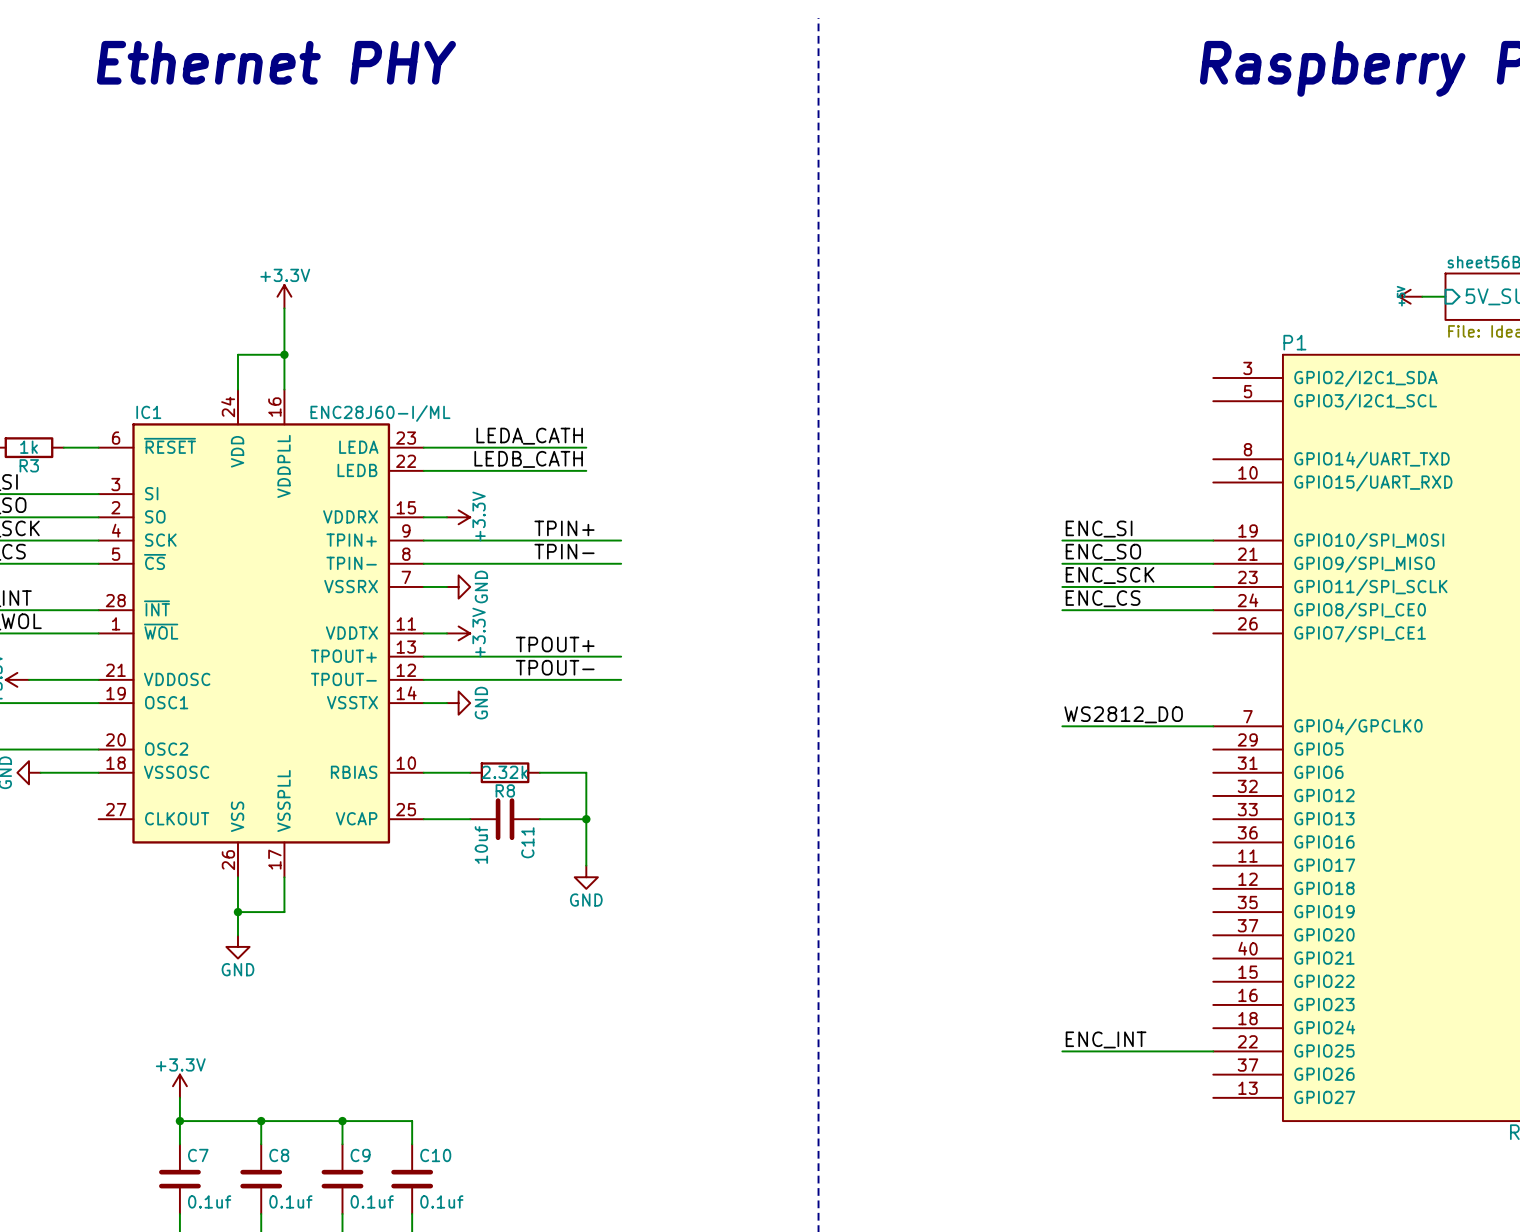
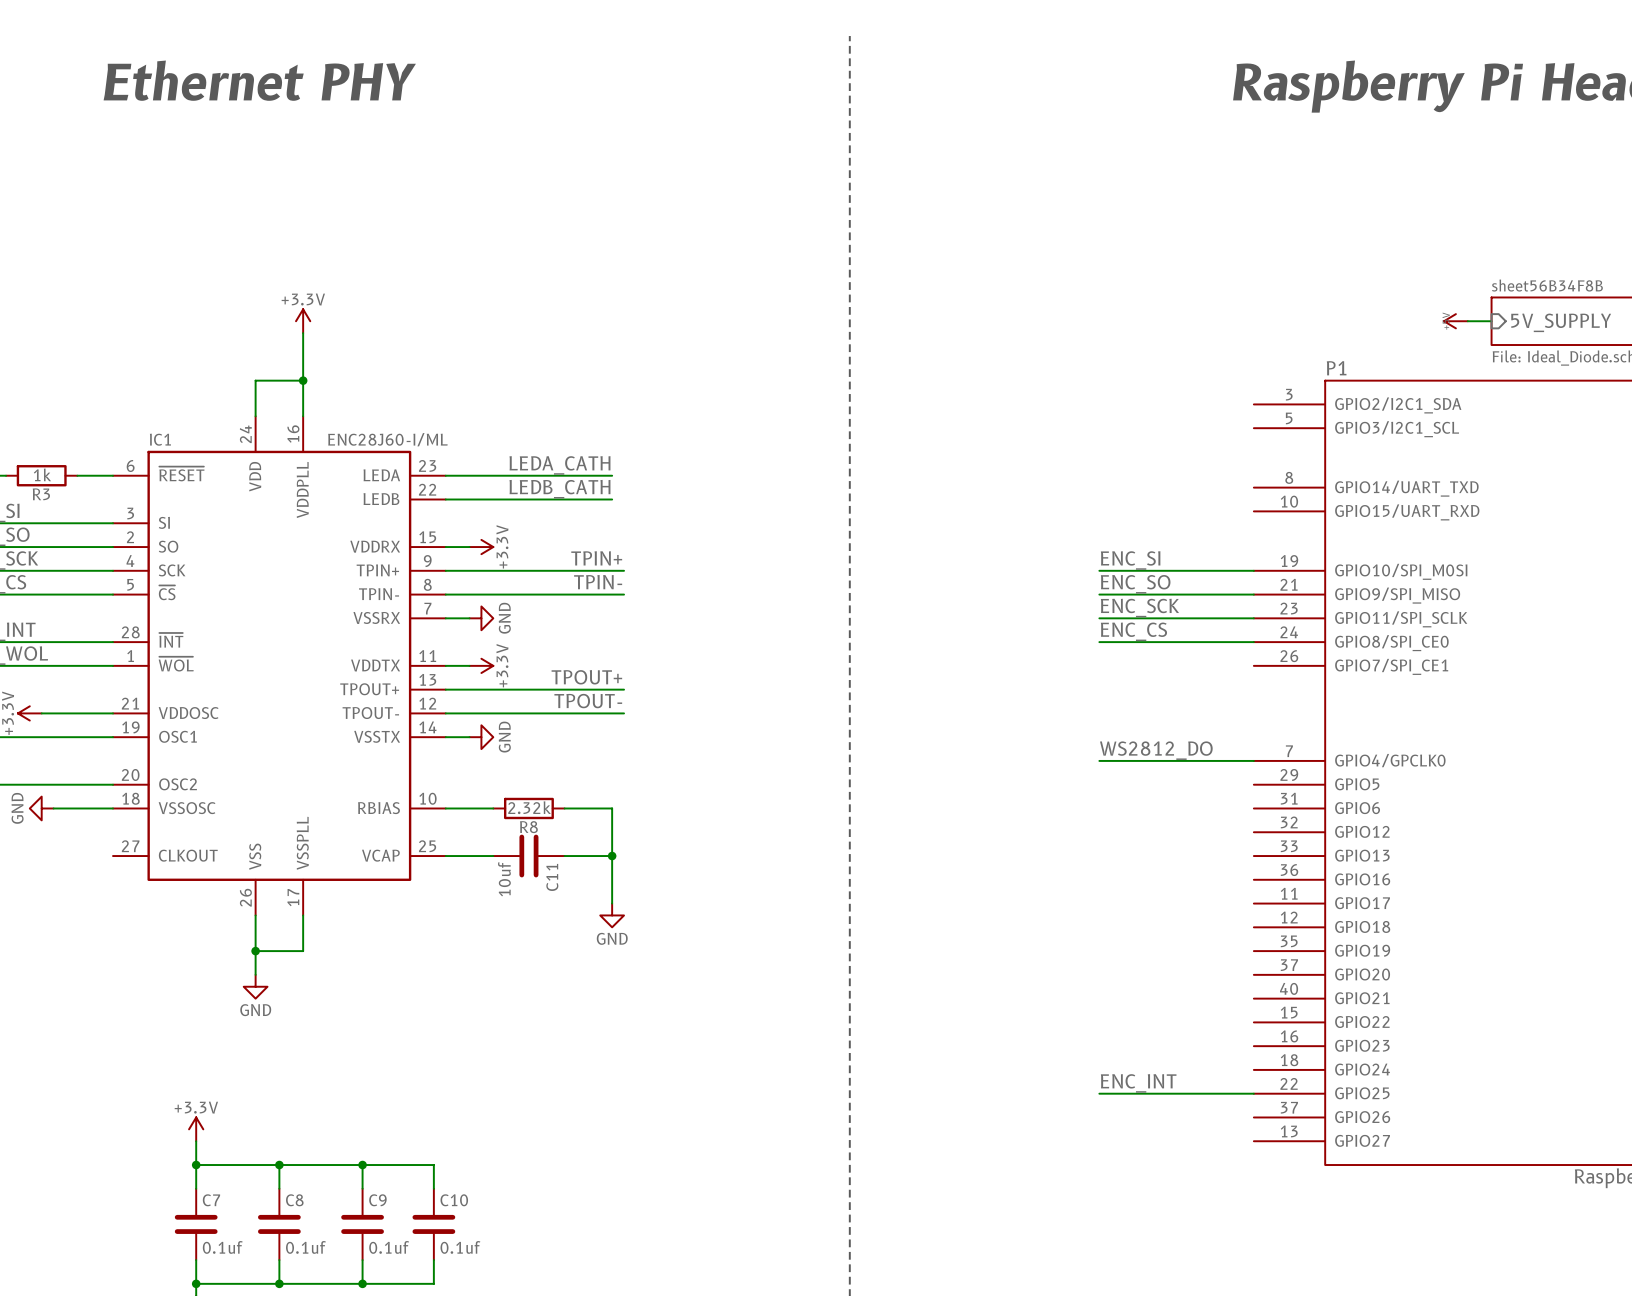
wire: (597, 540) (621, 540) -> none
wire: (597, 563) (621, 563) -> none
wire: (597, 656) (621, 656) -> none
wire: (597, 679) (621, 679) -> none

